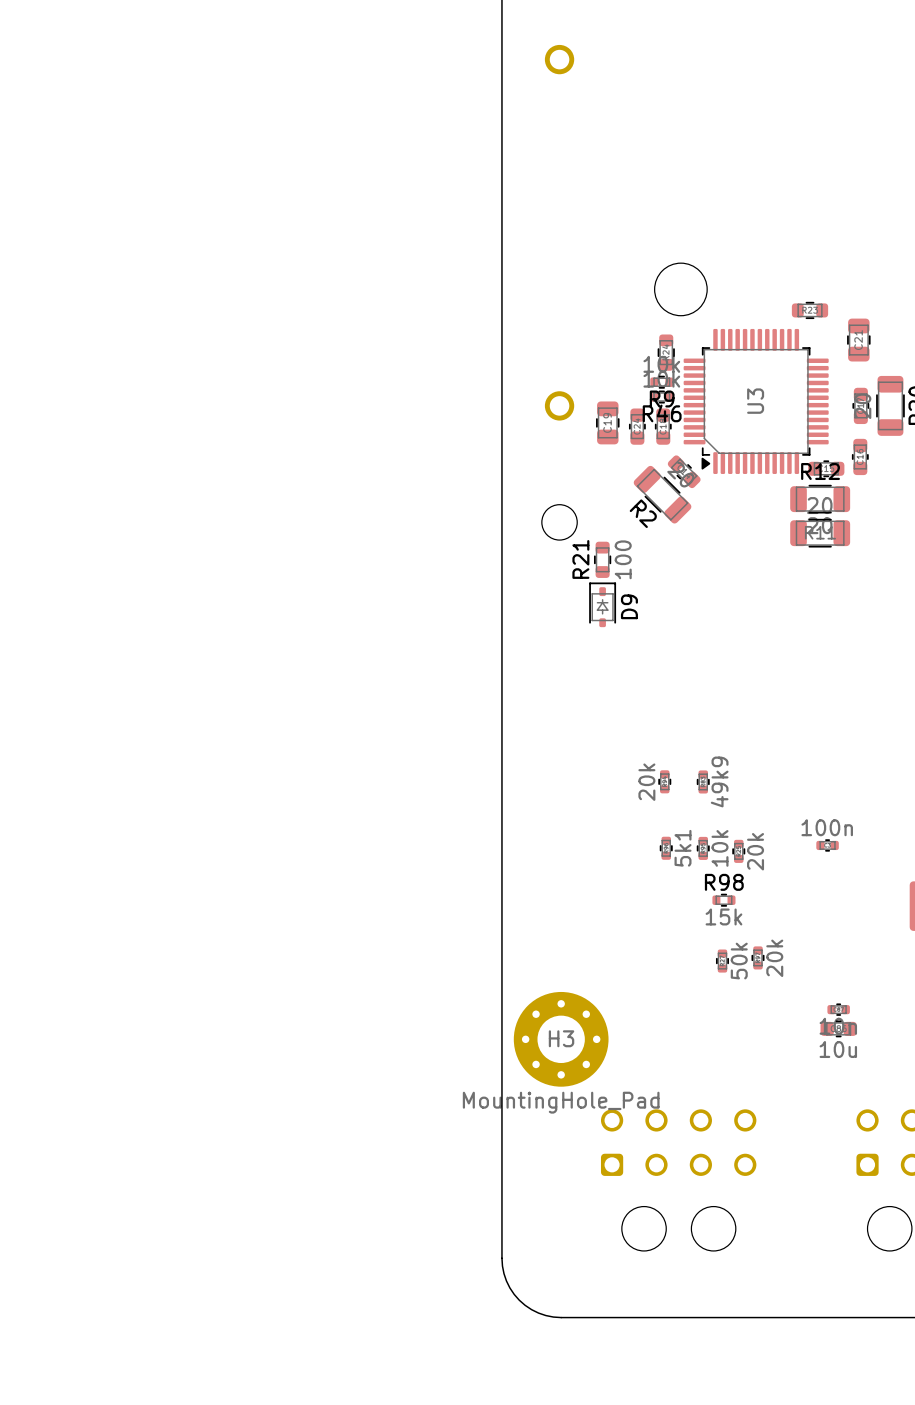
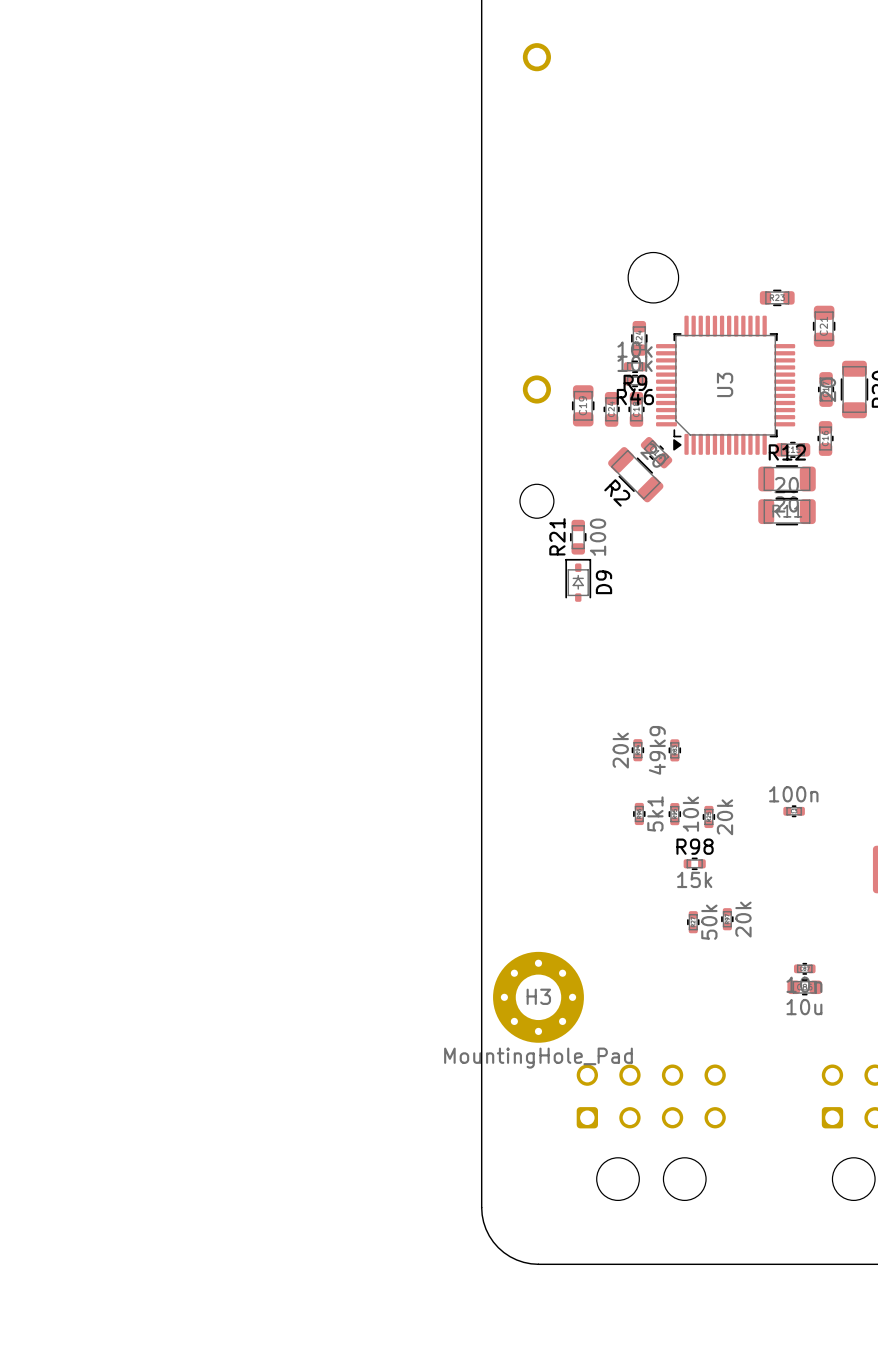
part value position: 49k9 (719, 781) -> 49k9 (657, 750)

